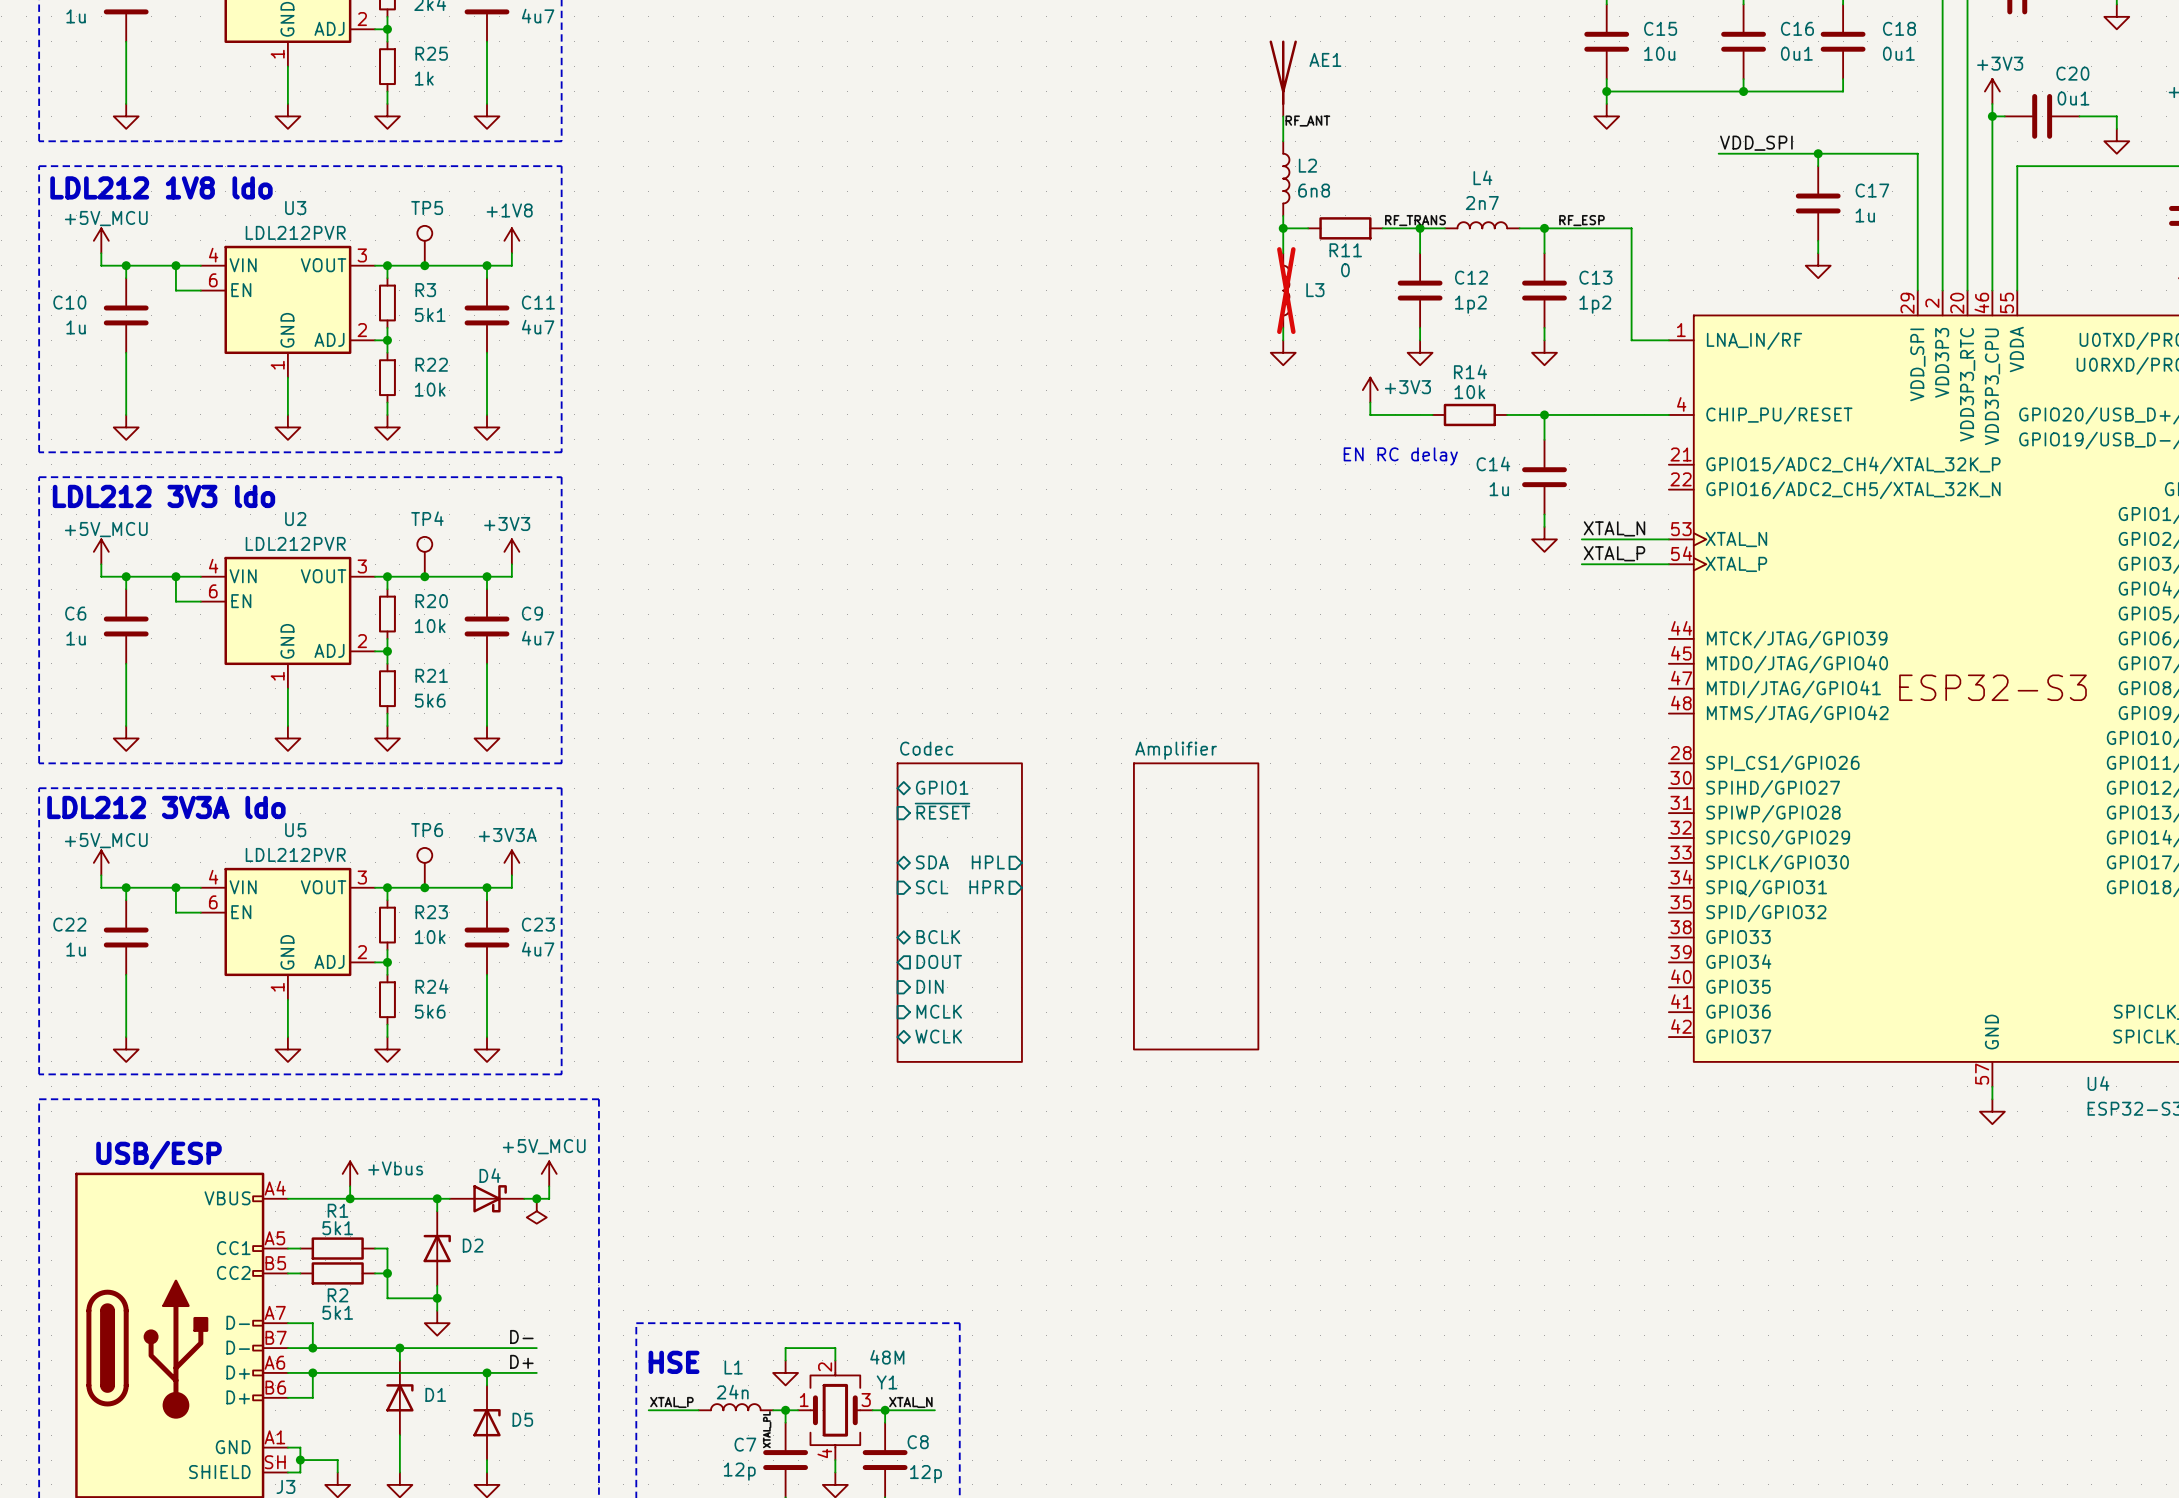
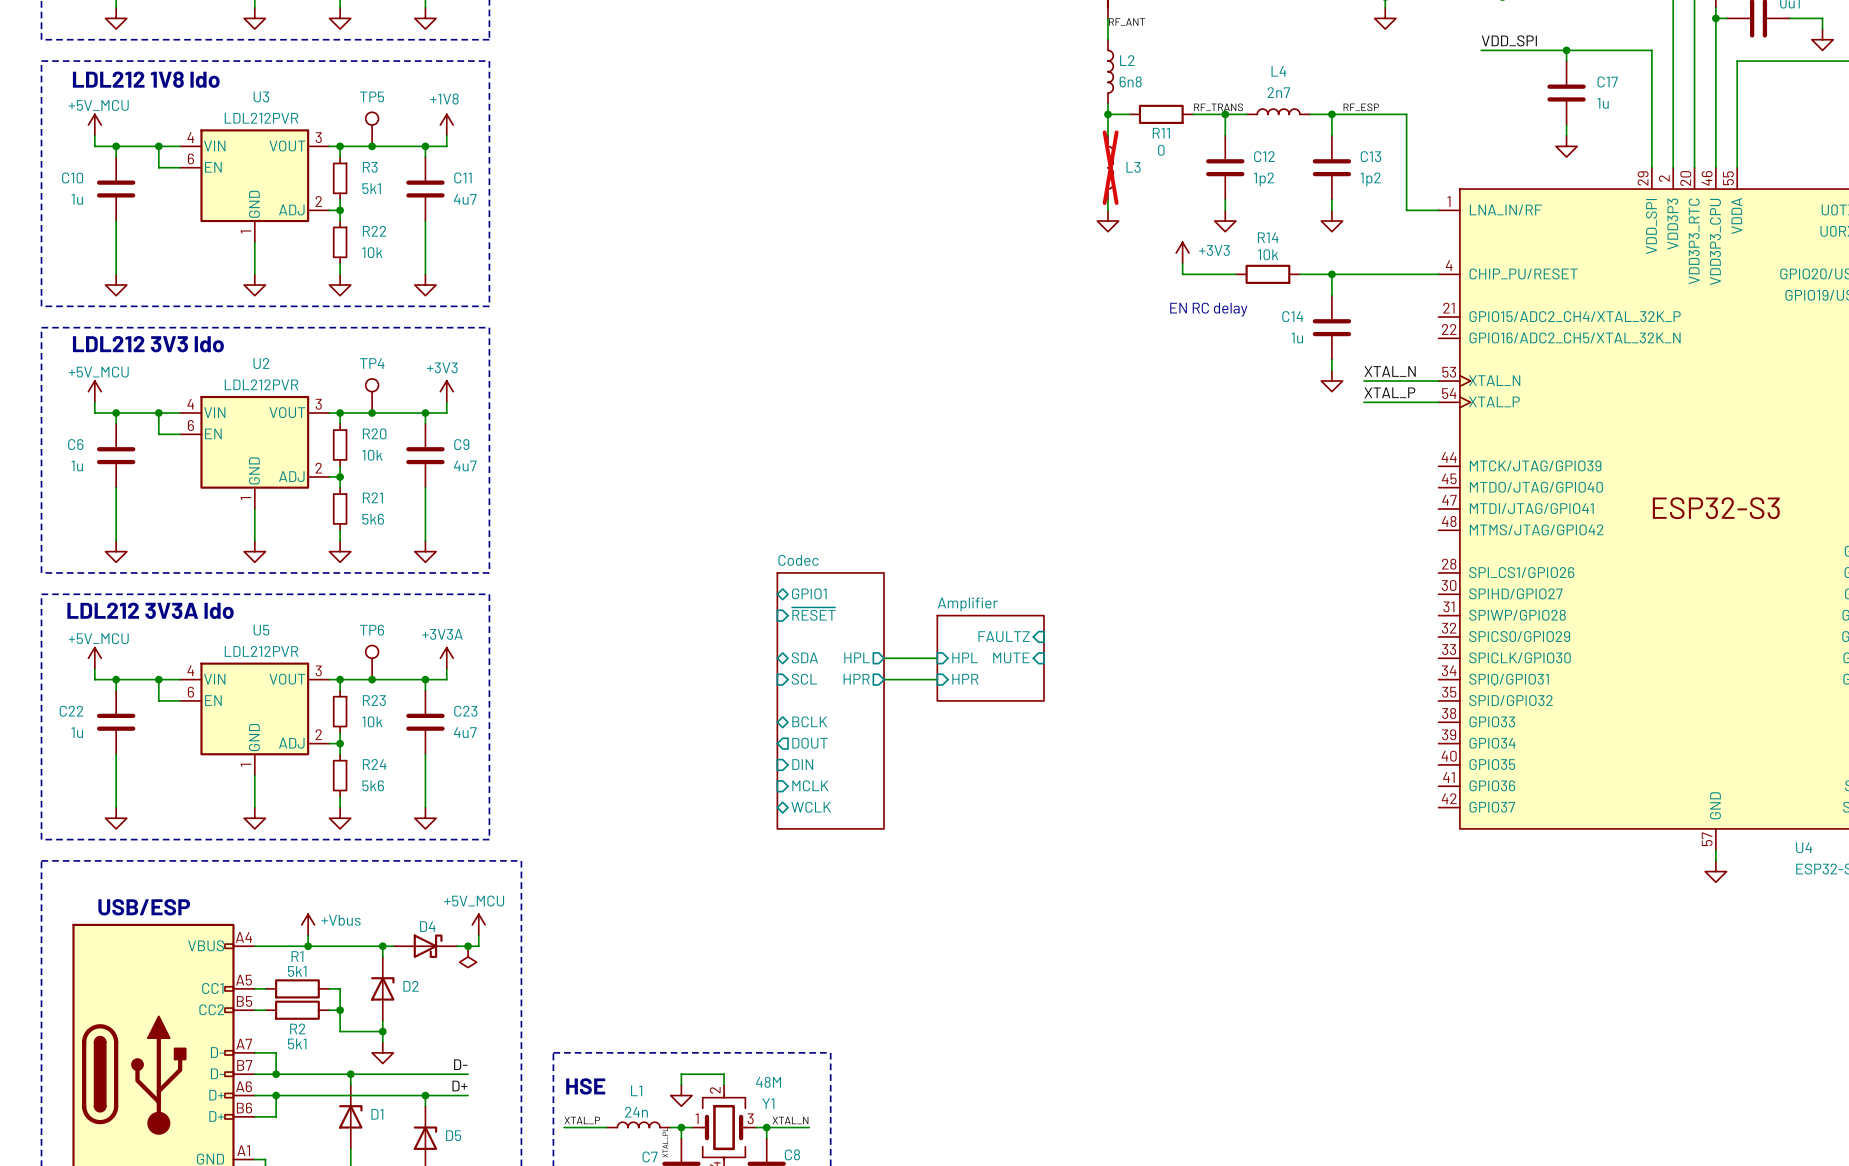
sheet pin: none -> FAULTZ (1004, 636)
wire: none -> (884, 658) (937, 658)
sheet pin: none -> HPL (965, 657)
sheet Amplifier: none -> (990, 658)
sheet pin: none -> MUTE (1011, 657)
wire: none -> (884, 679) (937, 679)
sheet pin: none -> HPR (965, 679)
sheet Amplifier: (1196, 906) -> none

